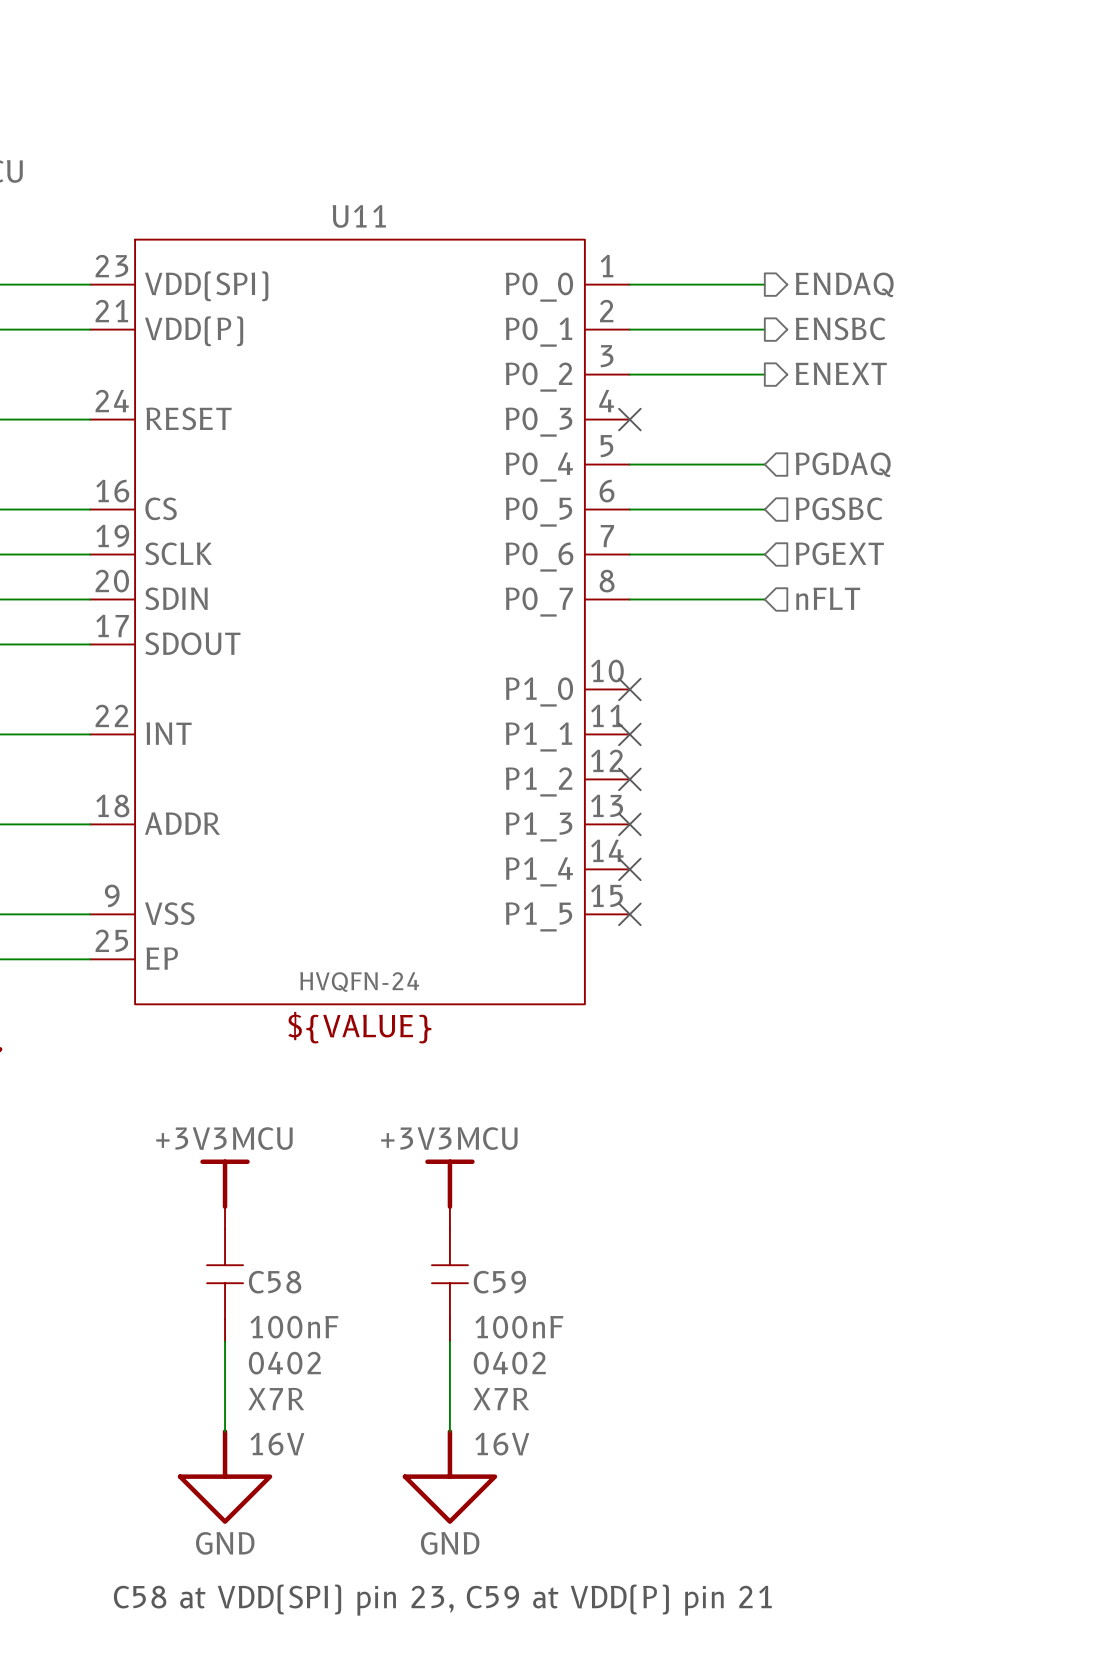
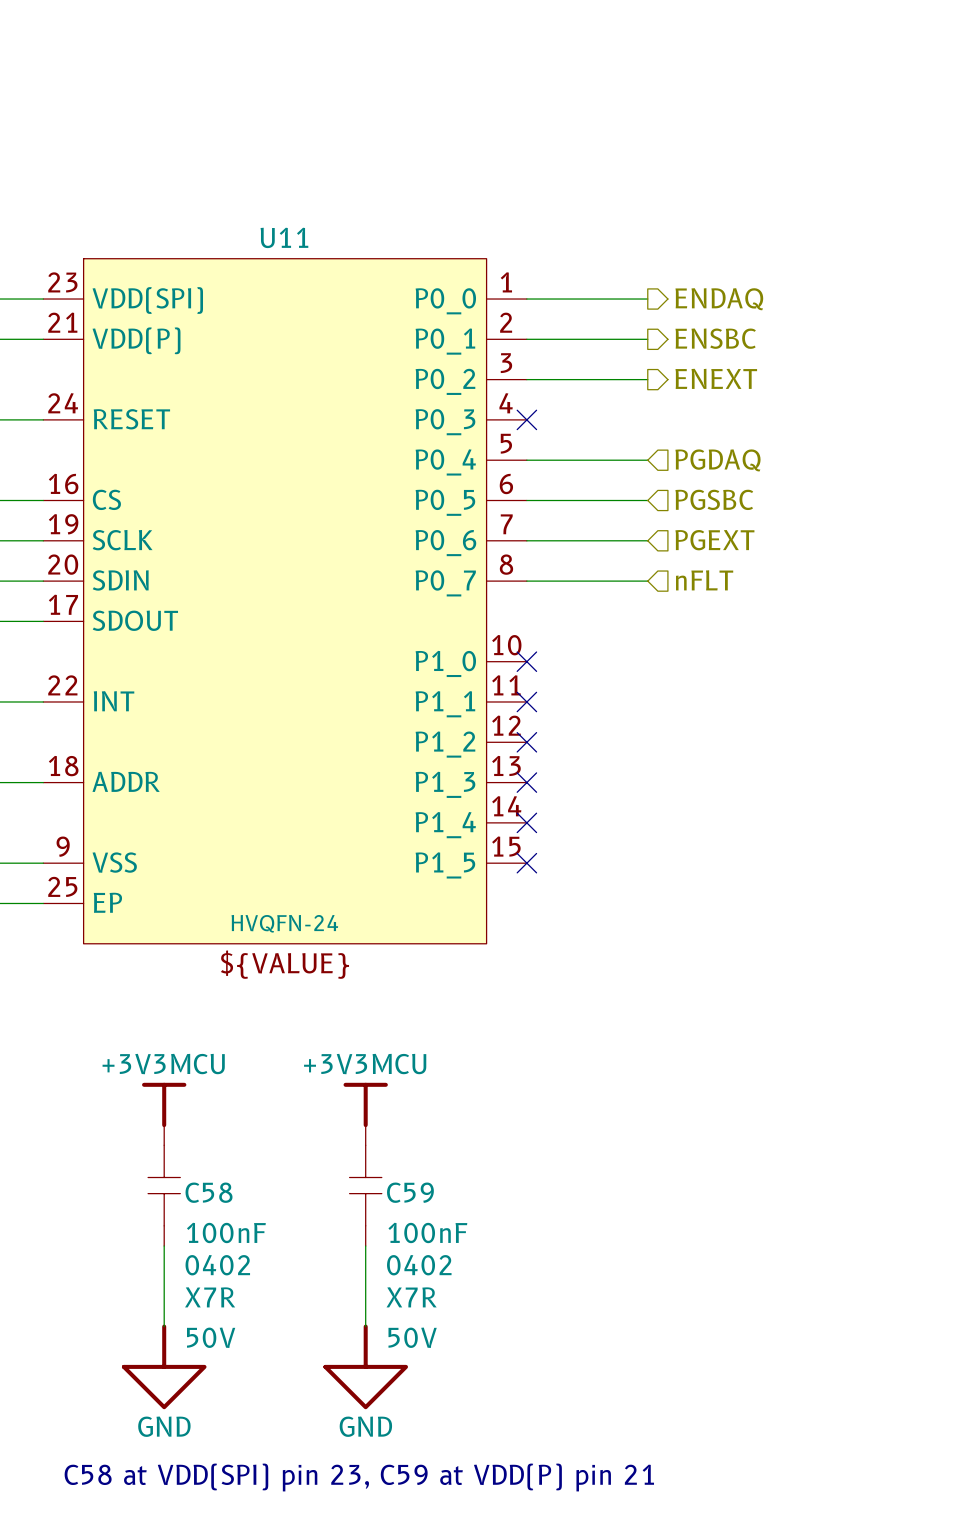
C58 text: 16V (277, 1444) -> 50V (211, 1337)
C59 text: 16V (502, 1444) -> 50V (412, 1337)

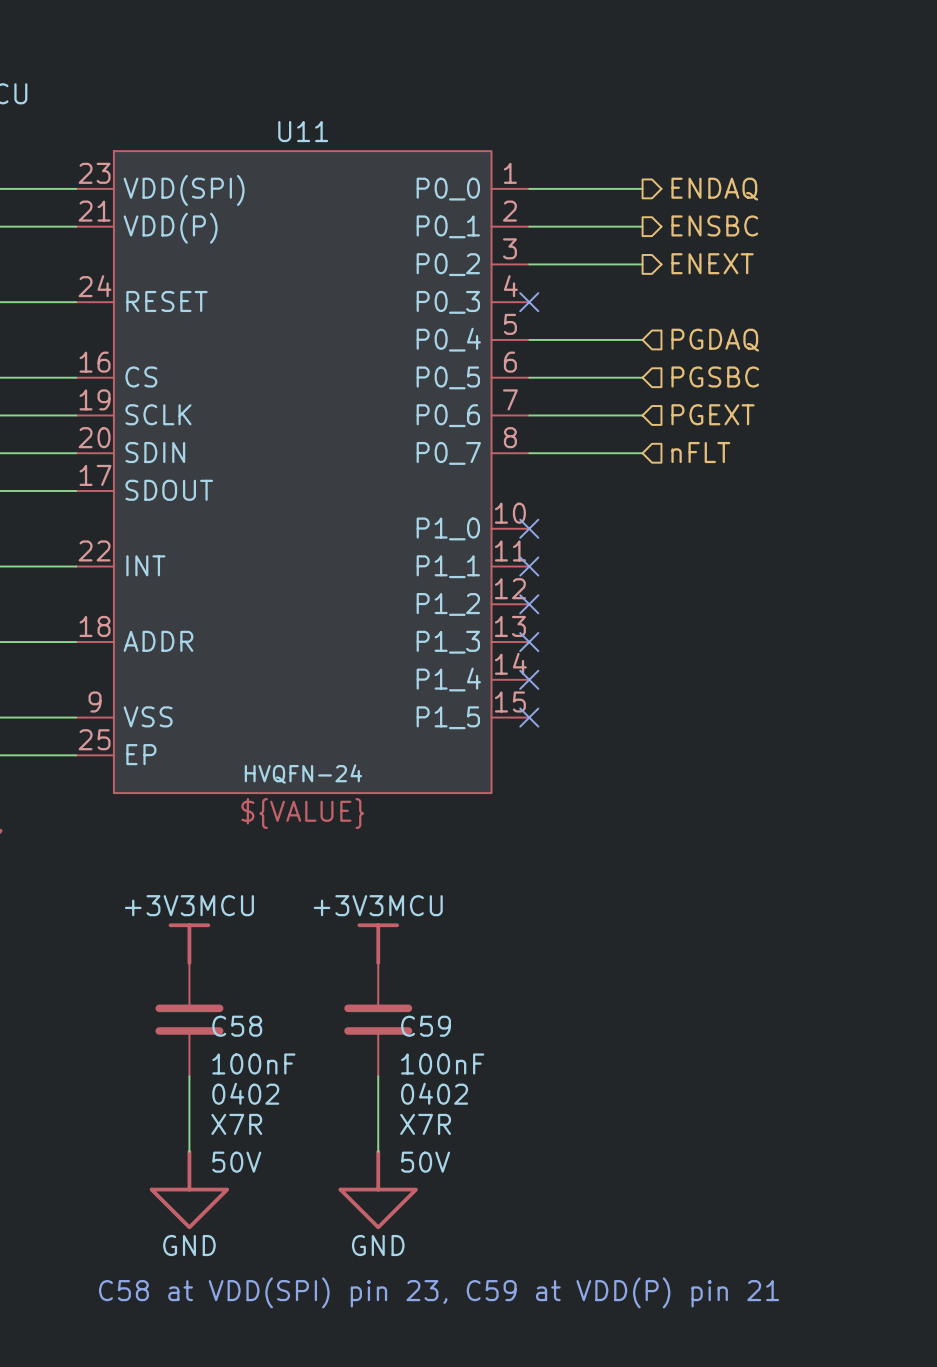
C58 symbol: [148, 1125, 181, 1247] -> [155, 963, 224, 1077]
C59 symbol: [349, 1125, 382, 1247] -> [344, 963, 413, 1077]

